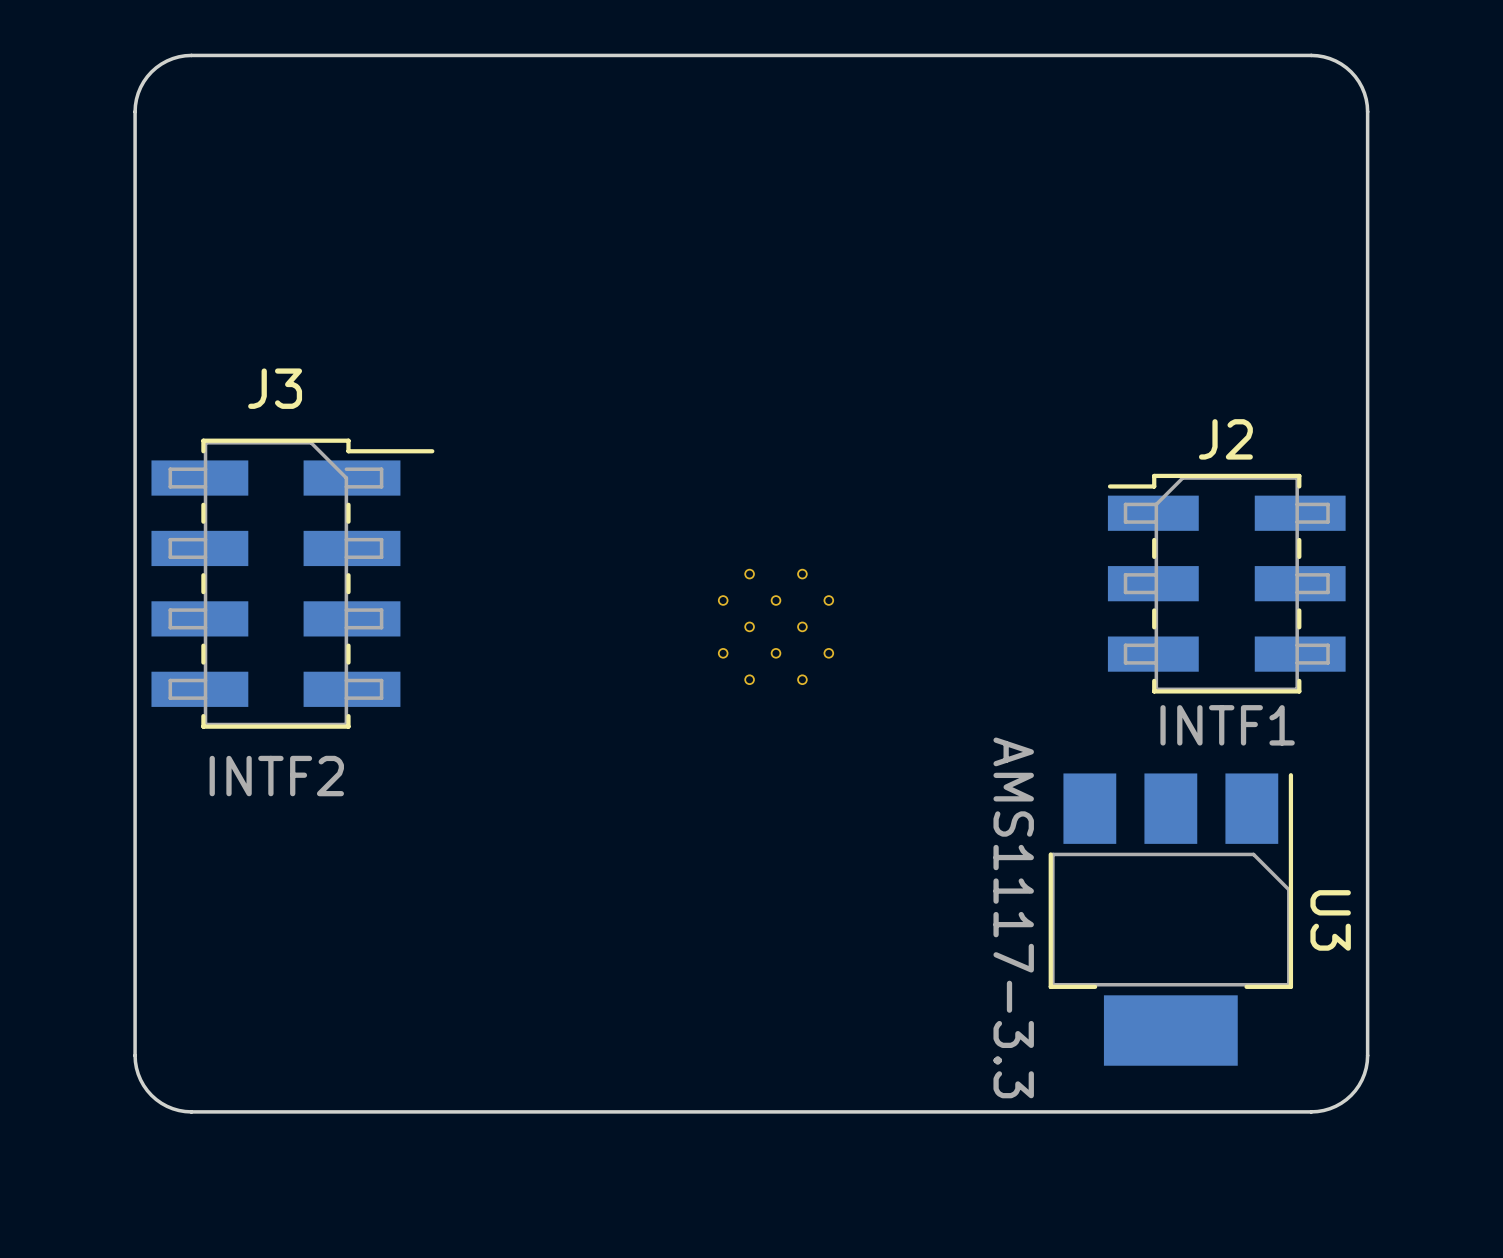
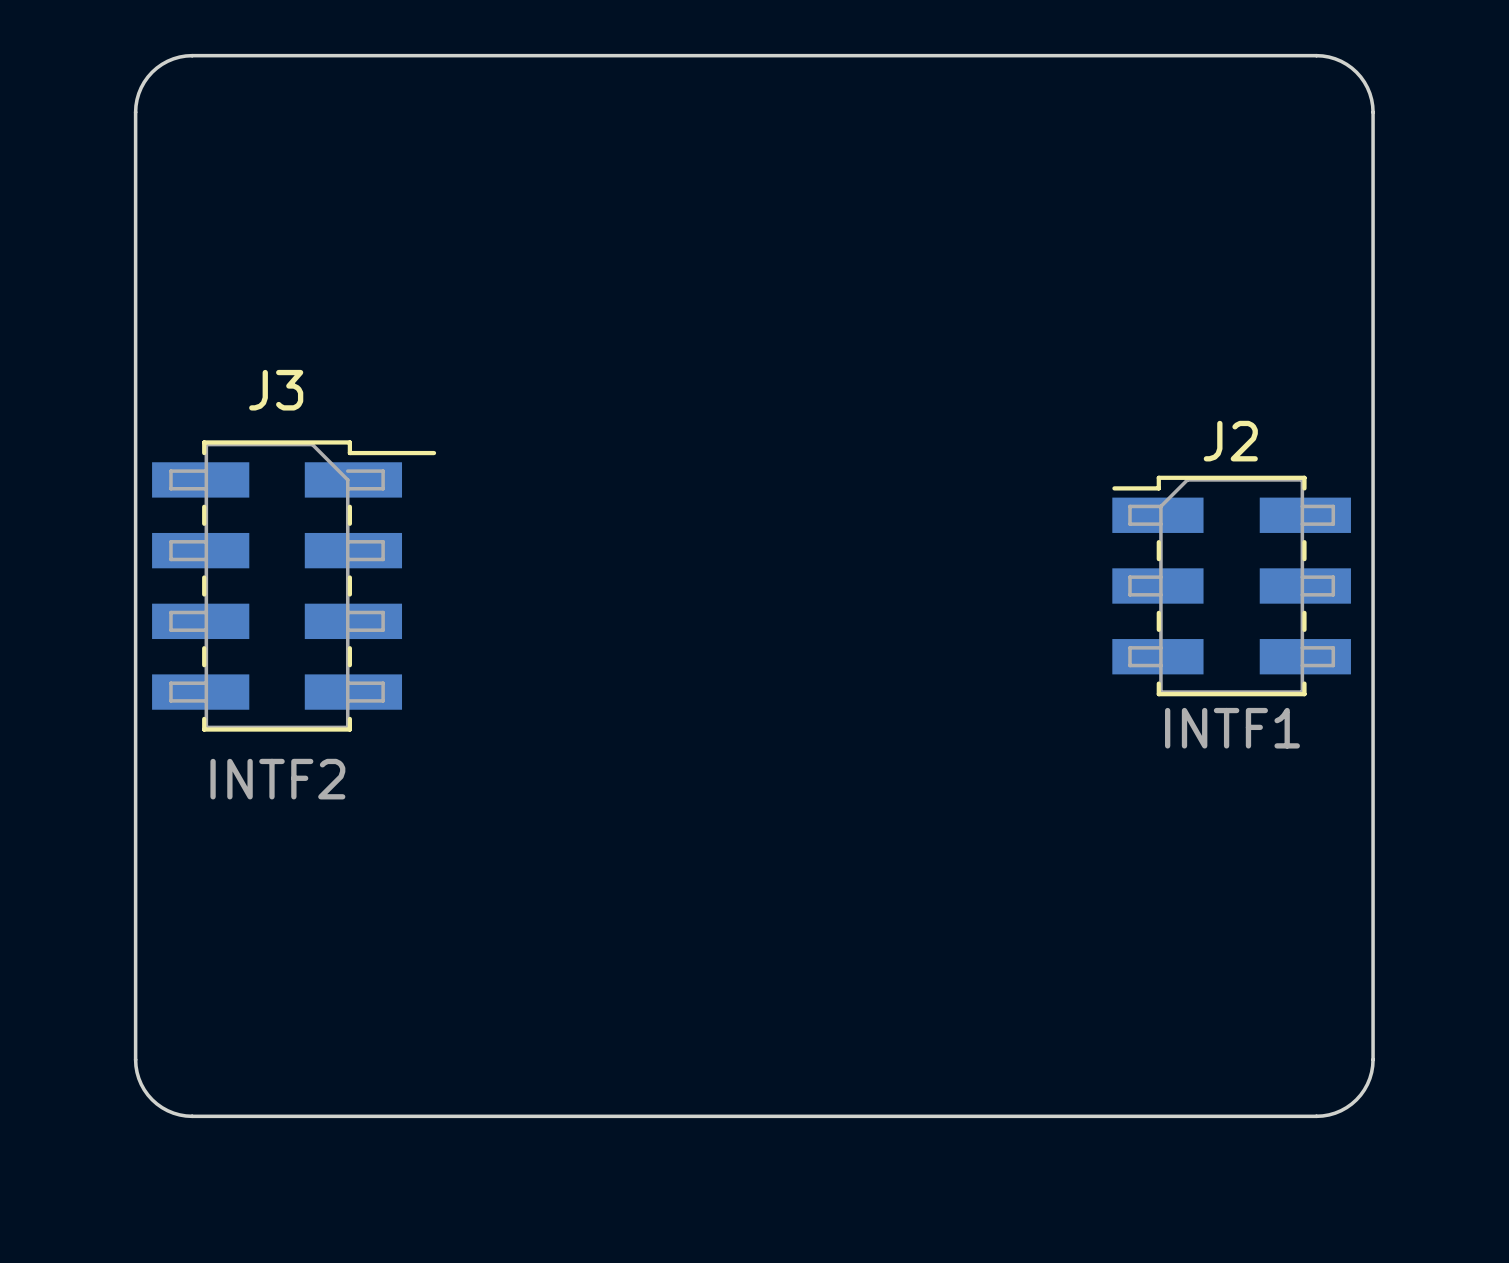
part: (776, 626) -> none
U3: AMS1117-3.3 (1170, 919) -> none

